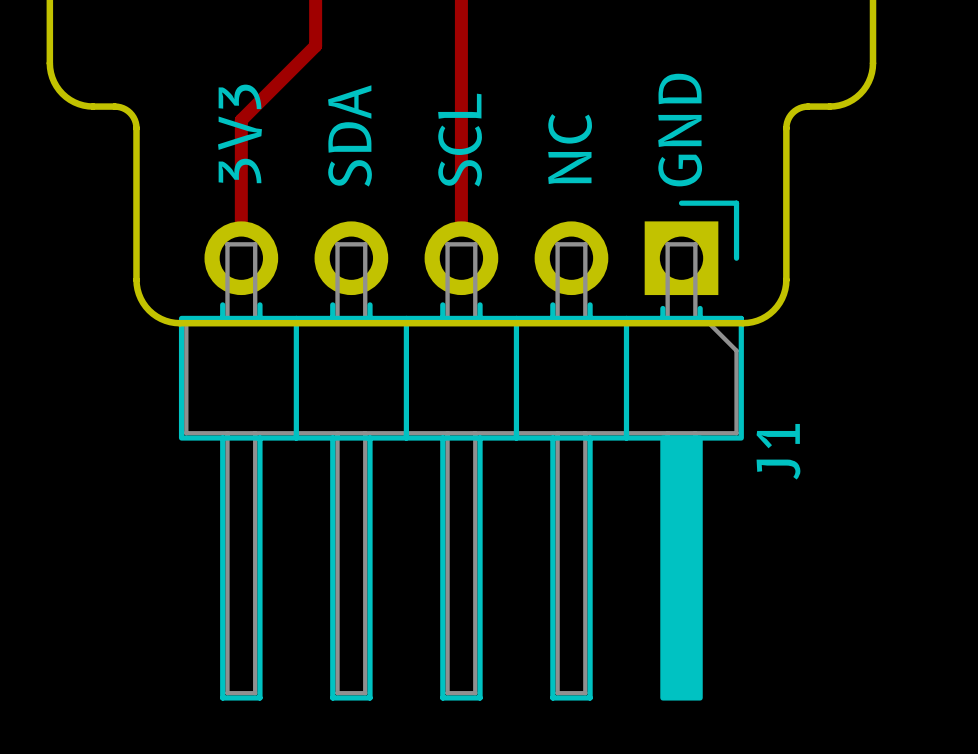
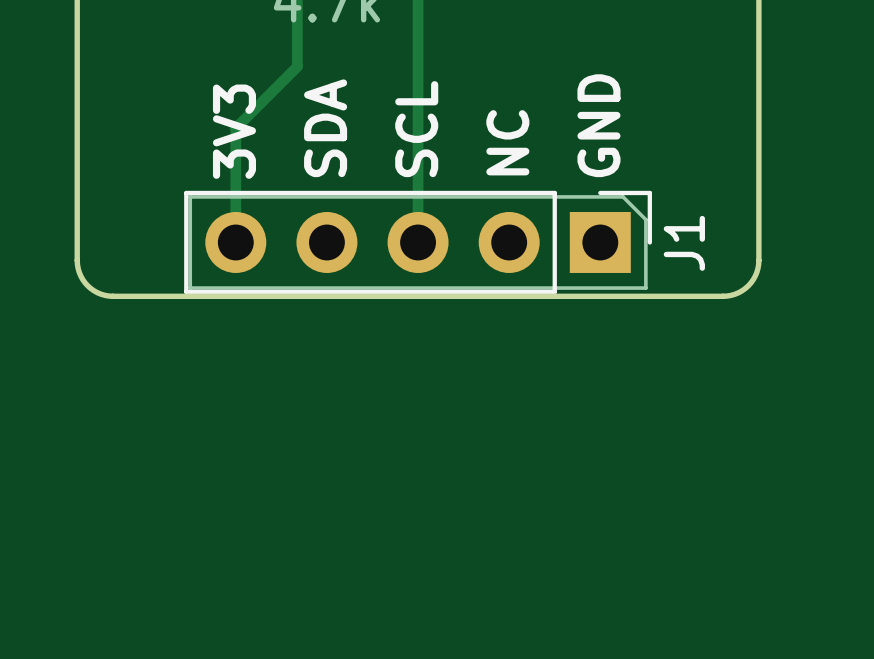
board edge: (49, 63) (52, 77) (56, 86) (70, 99) (88, 106) (120, 107) (128, 111) (133, 117) (136, 128) (137, 289) (143, 302) (152, 313) (165, 320) (179, 323) -> (77, 81) (77, 260) (80, 275) (90, 288) (105, 295) (184, 296)
board edge: (873, 63) (868, 82) (863, 90) (852, 99) (834, 106) (802, 107) (794, 111) (789, 117) (786, 128) (785, 289) (779, 302) (770, 313) (757, 320) (743, 323) -> (758, 81) (758, 260) (755, 275) (745, 288) (730, 295) (651, 296)
J1 footprint: [178, 200, 744, 701] -> [184, 190, 652, 295]

